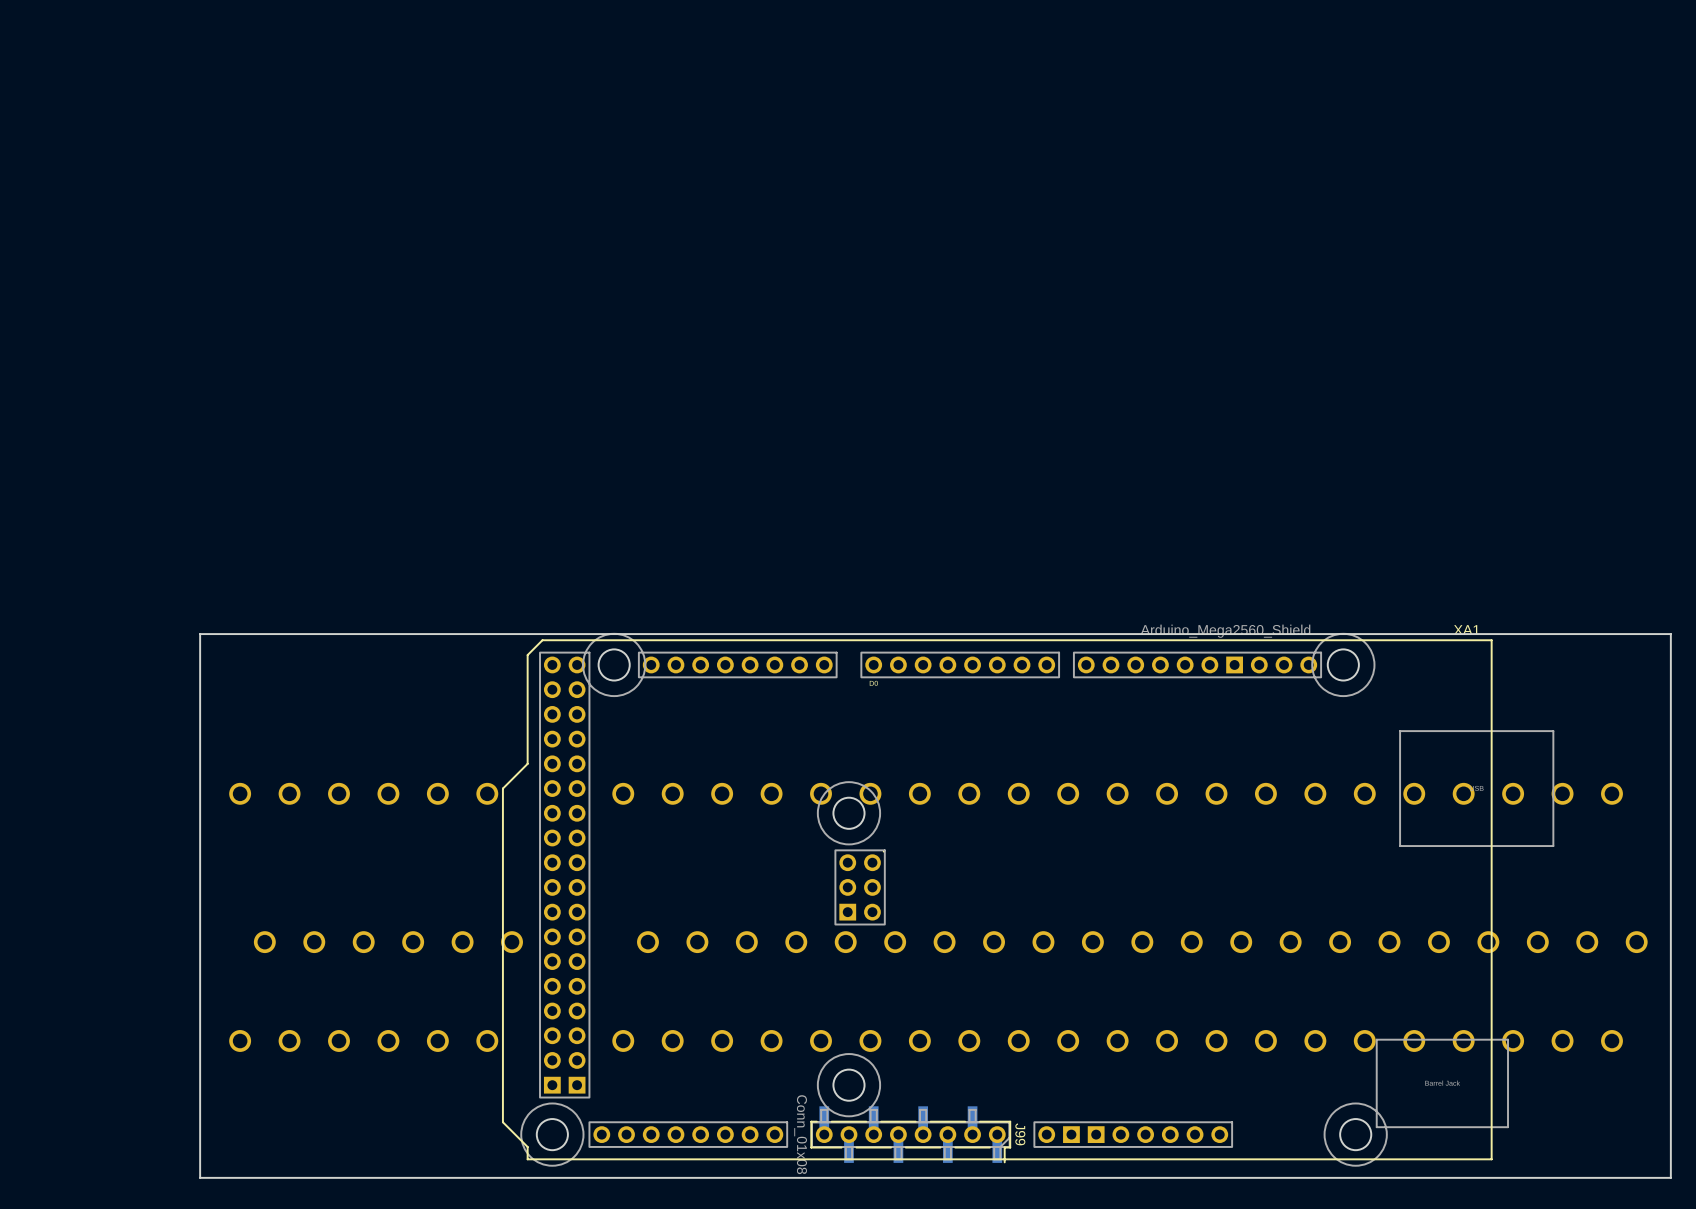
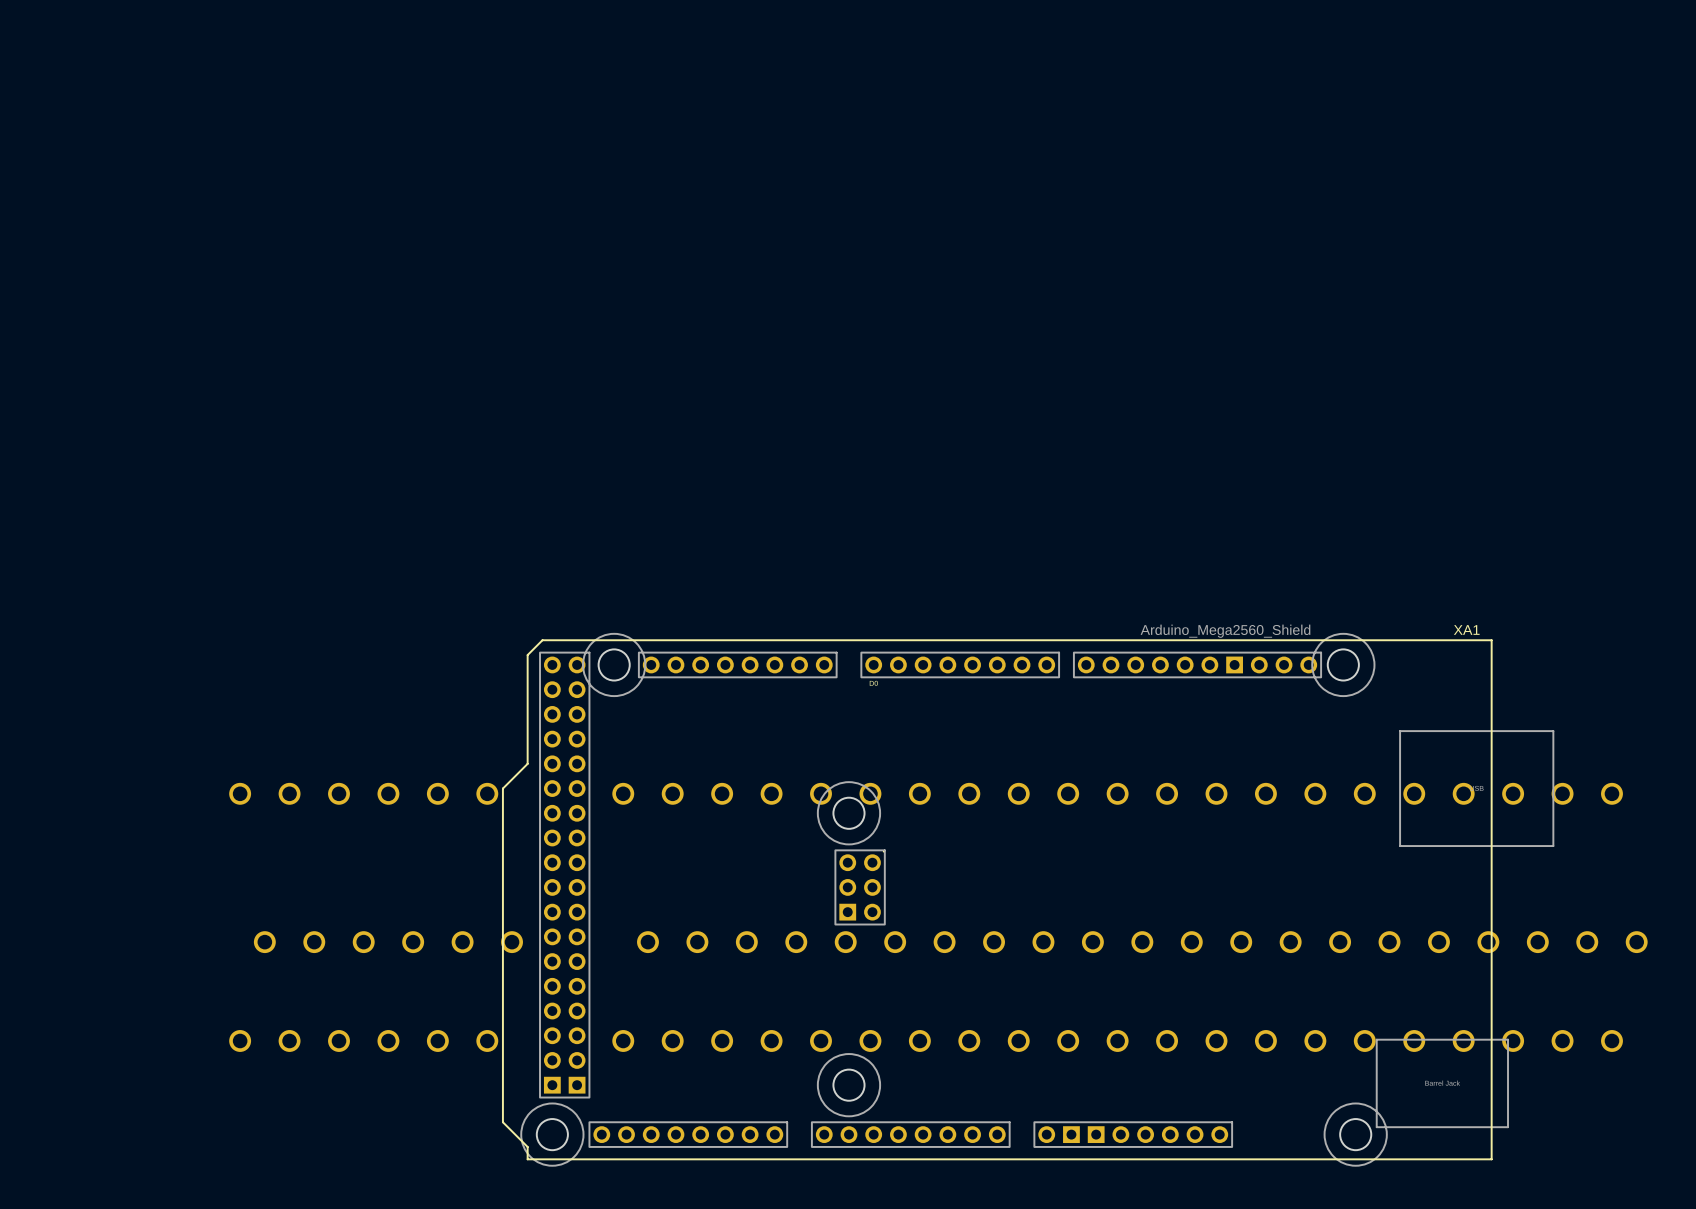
board edge: (1670, 634) (200, 634) (200, 1177) (1670, 1177) (1670, 634) -> none
J99: Conn_01x08 (910, 1134) -> none

